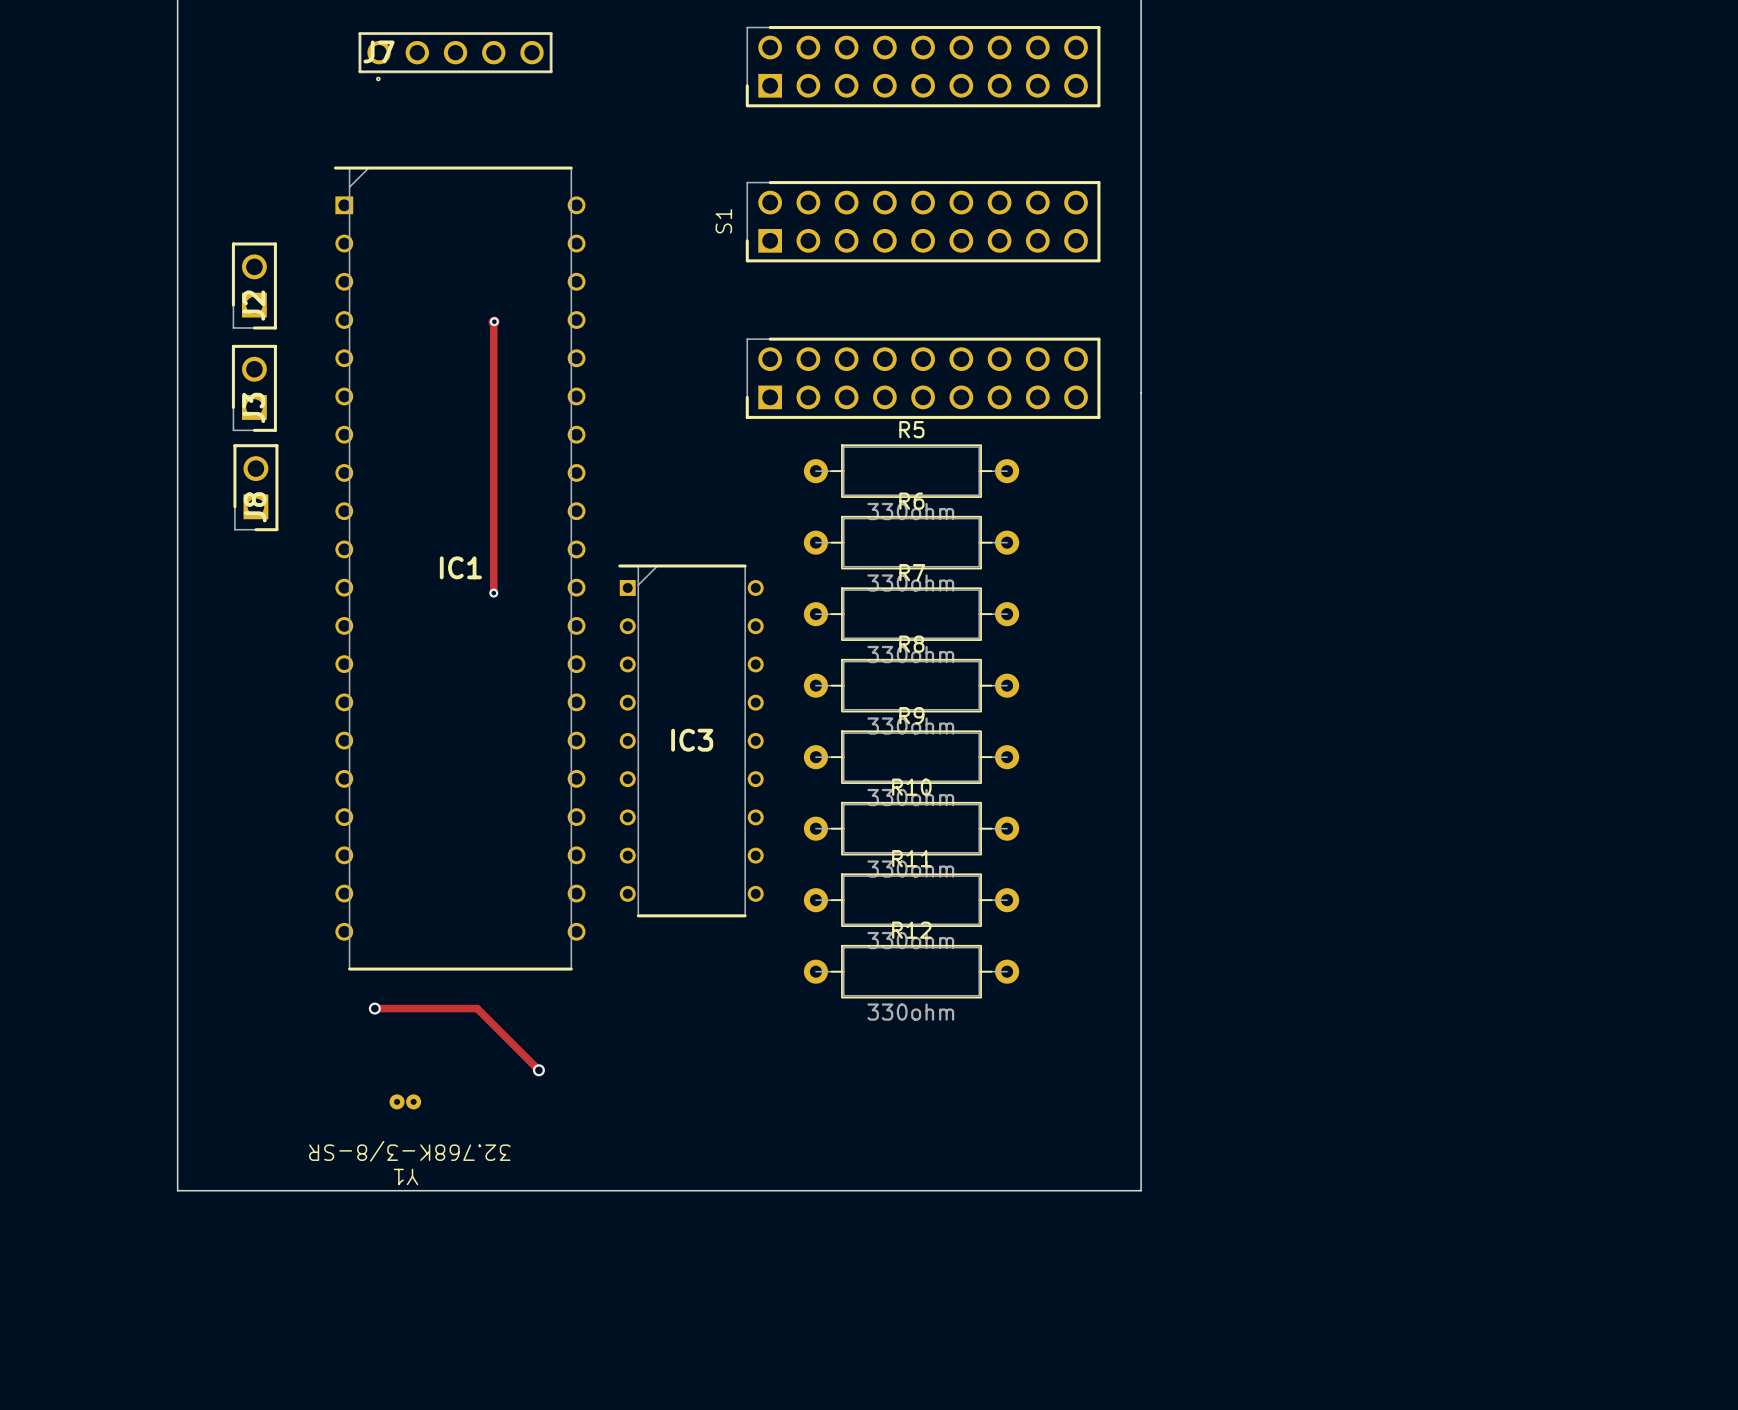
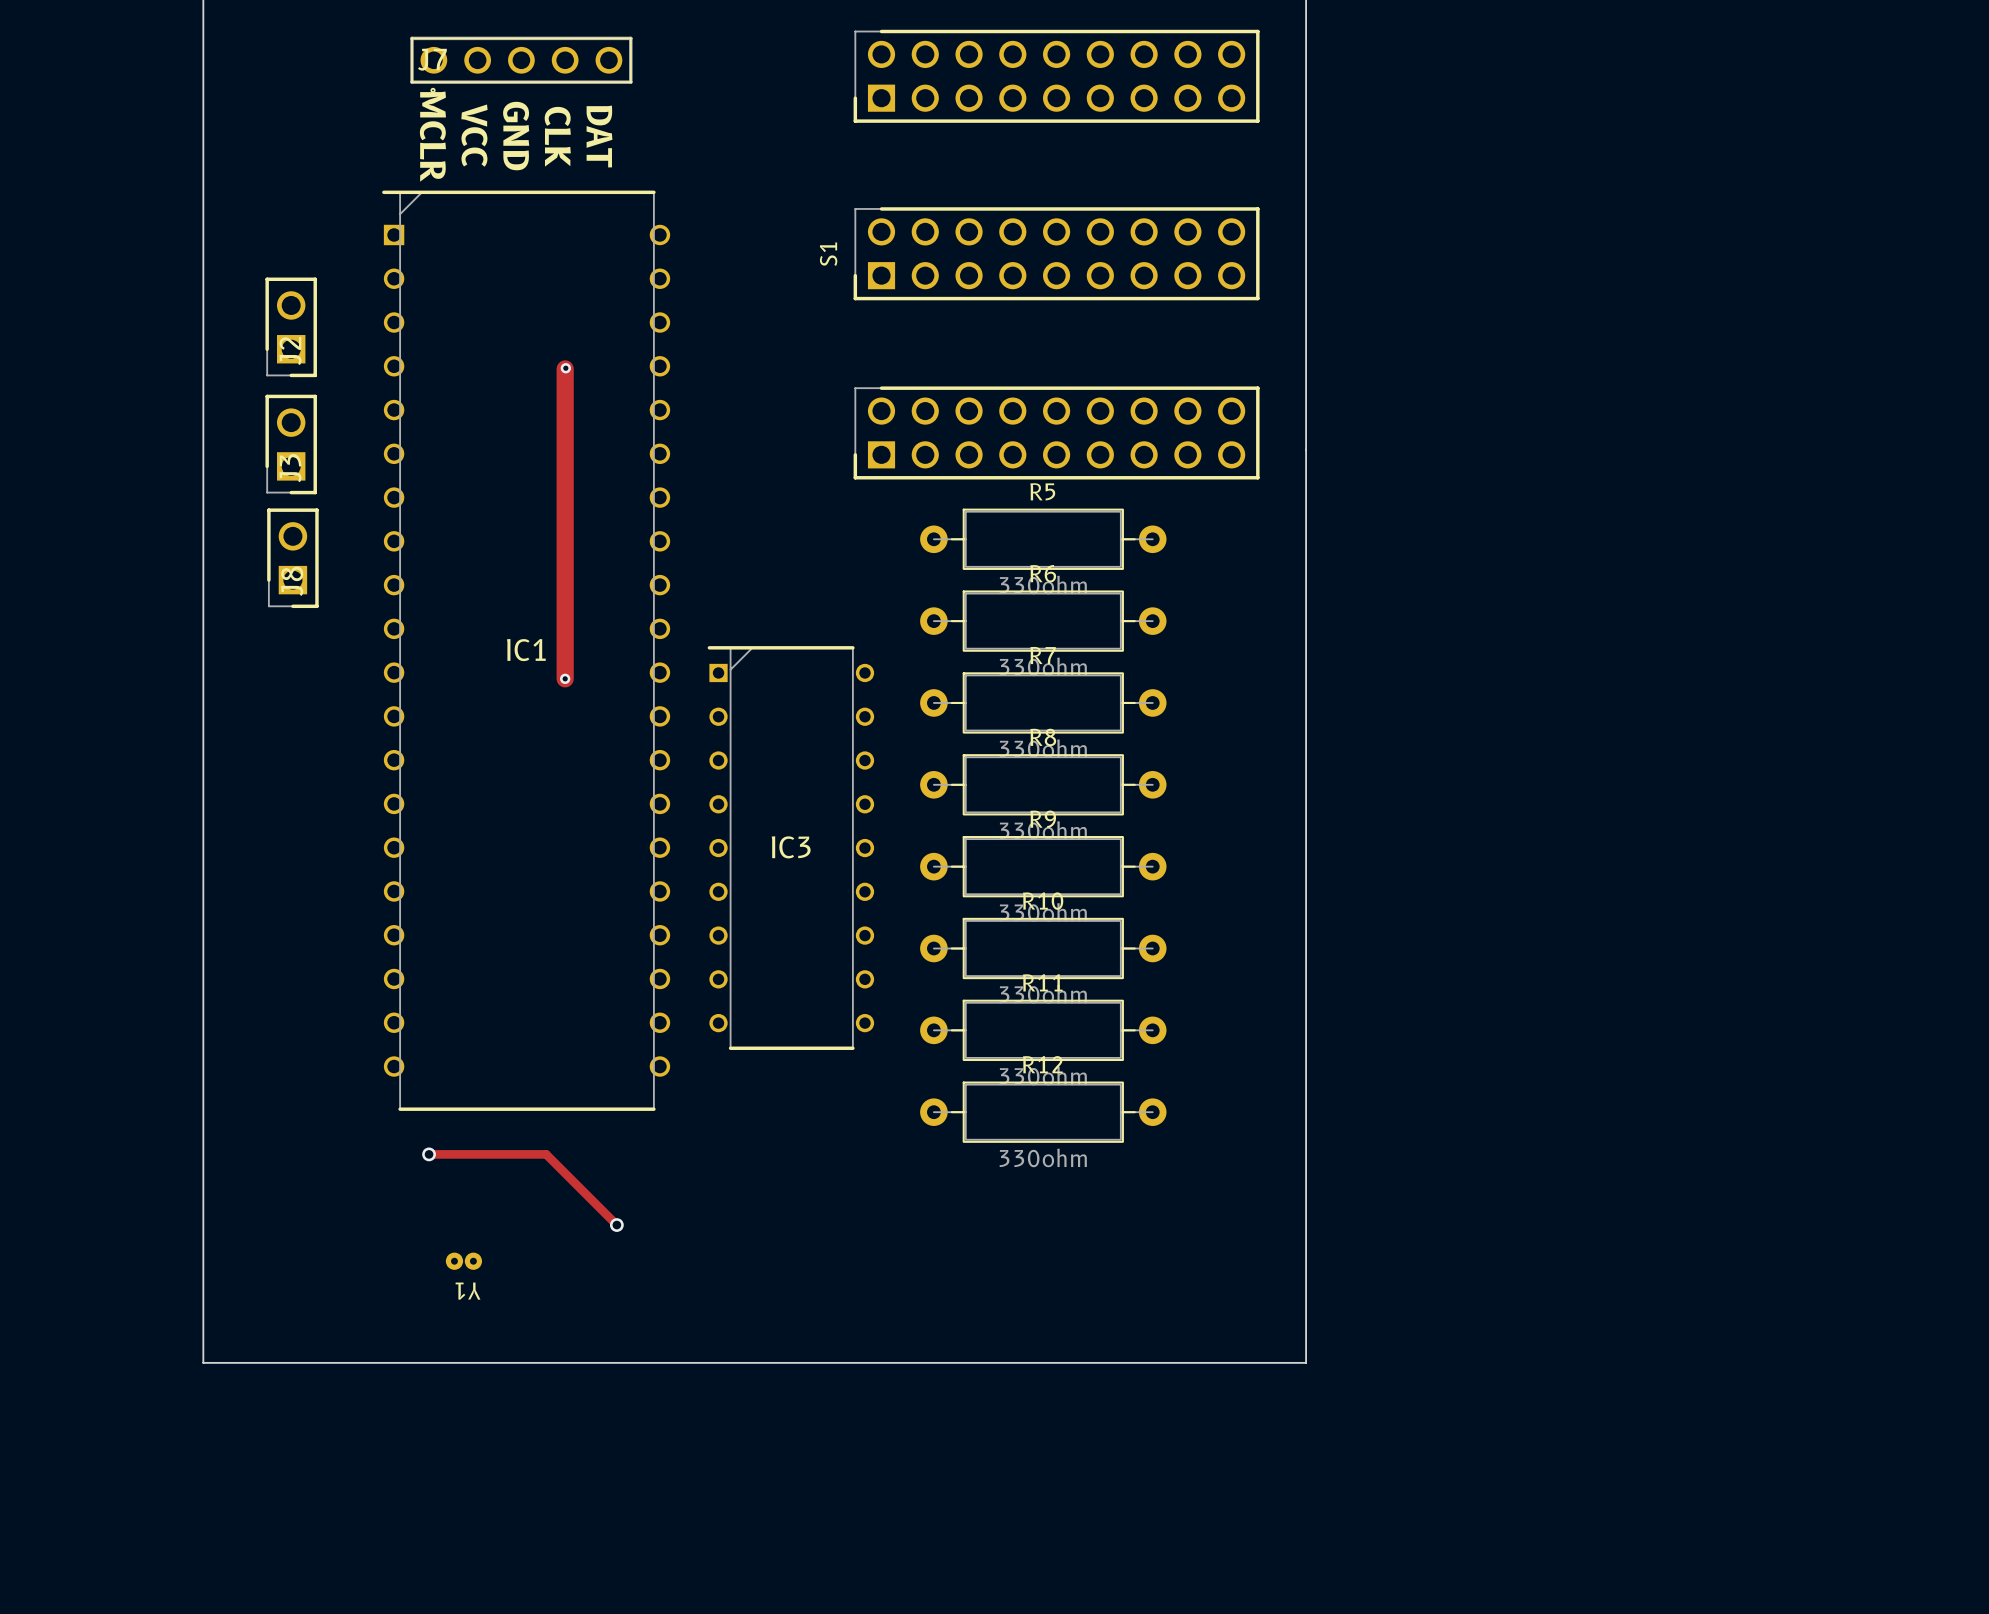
text: none -> VCC (474, 135)
text: none -> GND (516, 136)
text: none -> CLK (557, 136)
text: none -> MCLR (432, 136)
text: none -> DAT (599, 136)
track width: thin (493, 322) (493, 593) -> thick (565, 368) (565, 678)
Y1 text: 32.768K-3/8-SR (409, 1151) -> none
Y1 name position: Y1 (406, 1176) -> Y1 (468, 1291)

